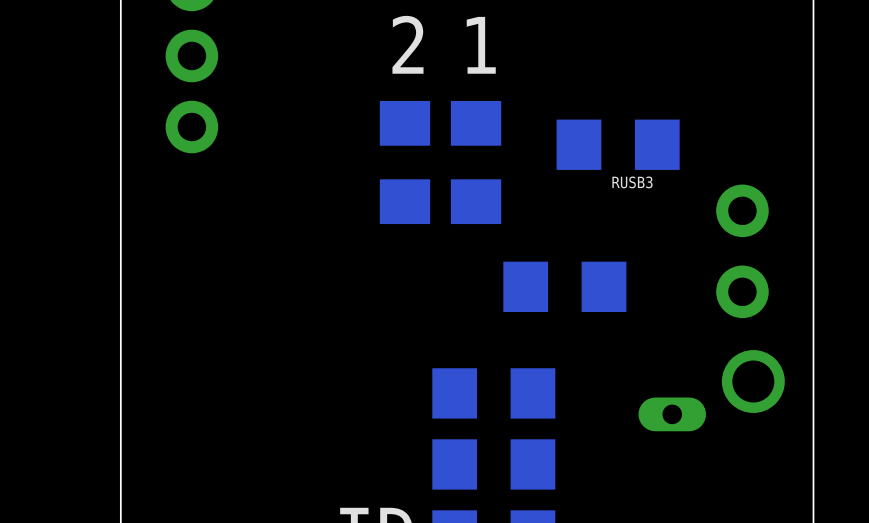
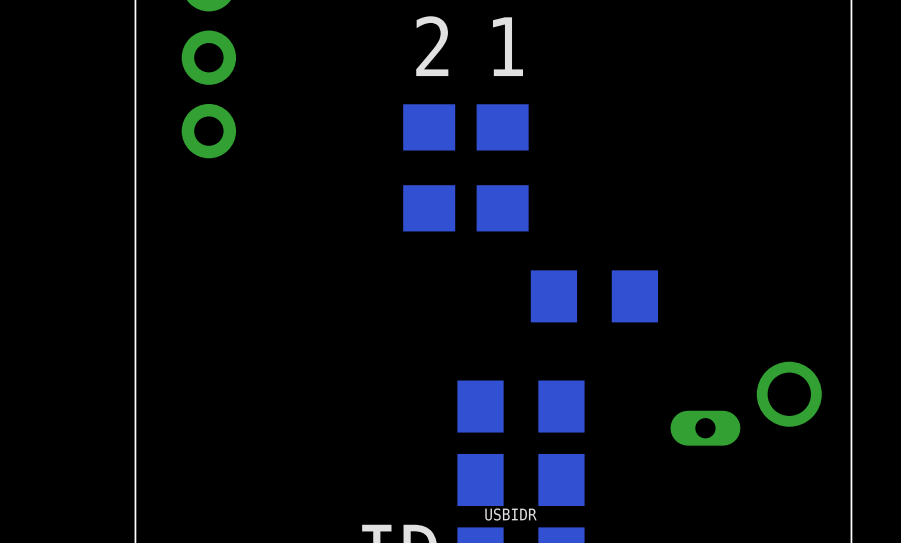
RUSB3: (618, 144) -> none
part: (742, 251) -> none
USBIDR name: none -> USBIDR (510, 514)

